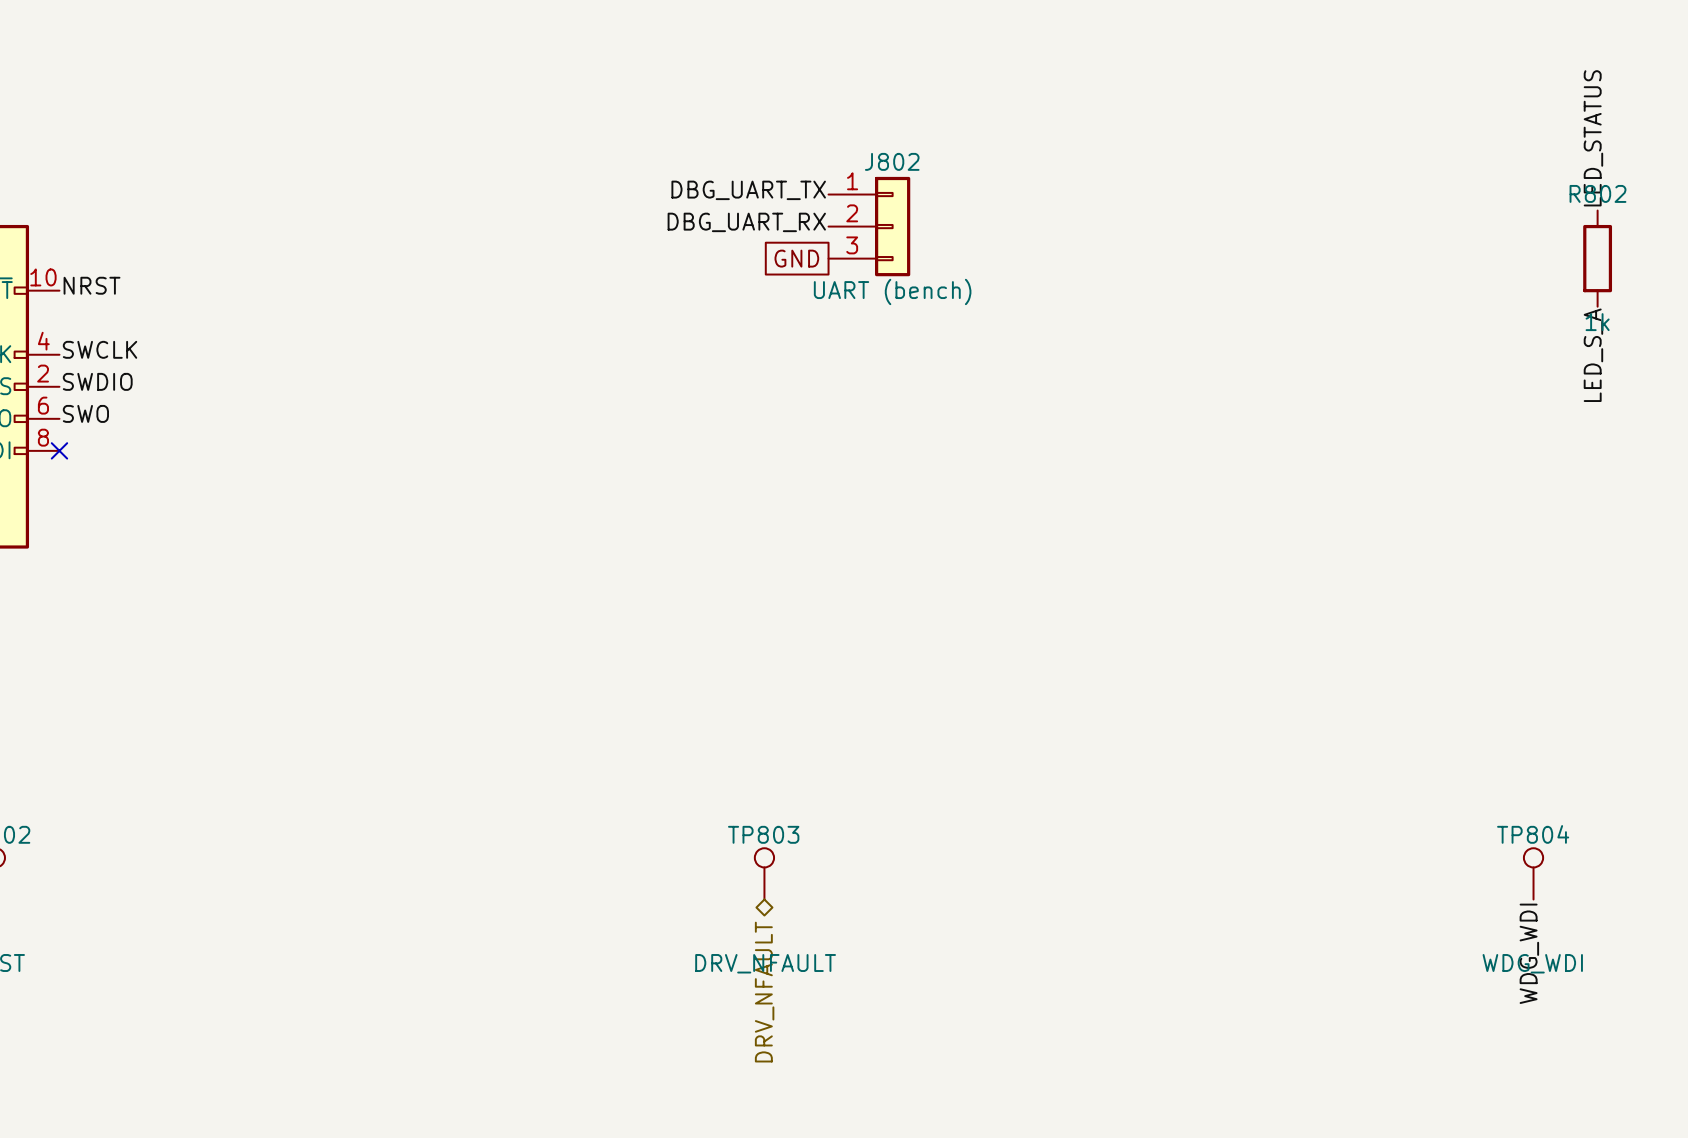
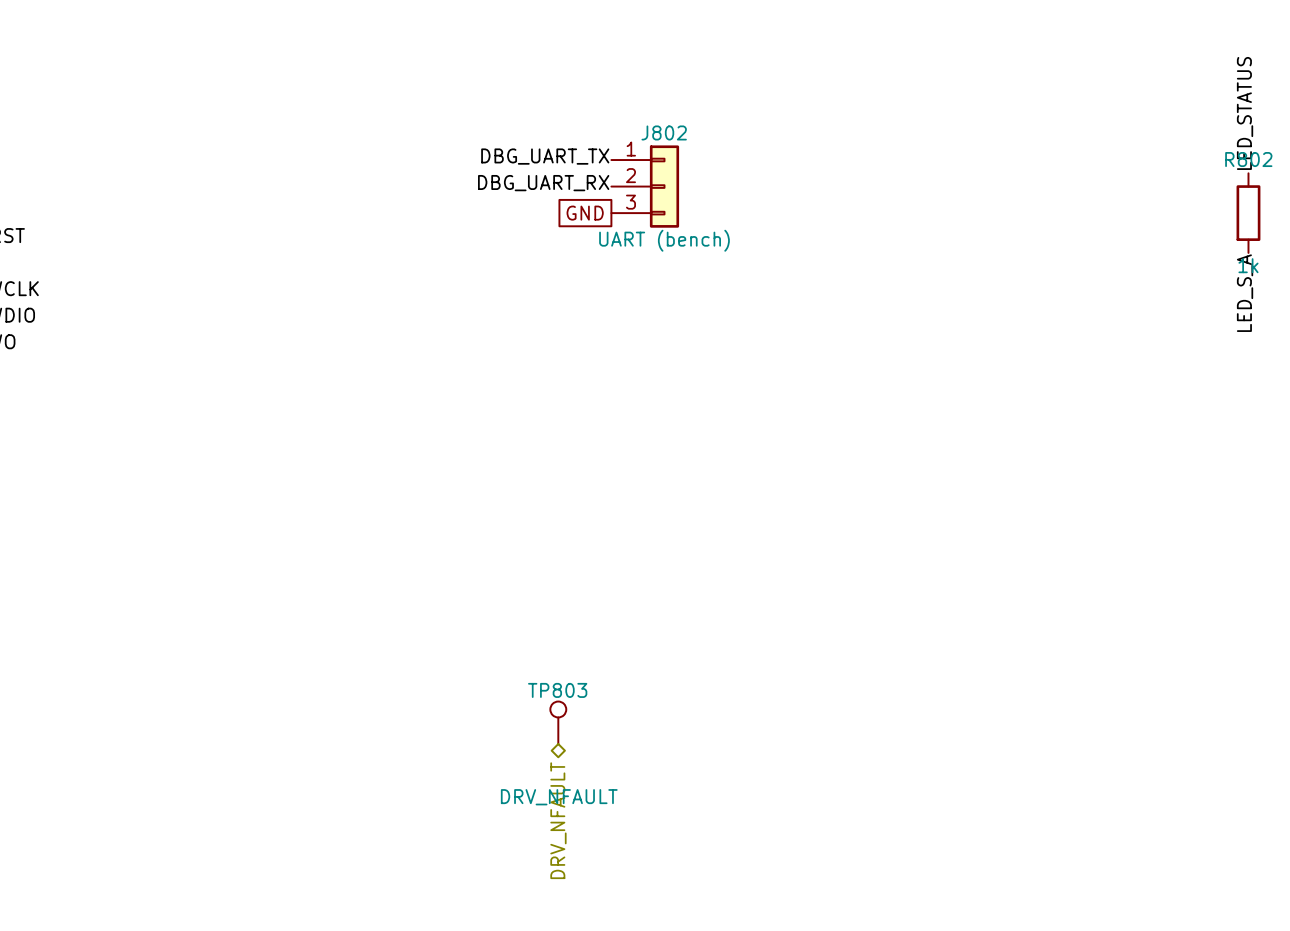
TP804: WDG_WDI (1533, 873) -> none
label: WDG_WDI (1529, 953) -> none

